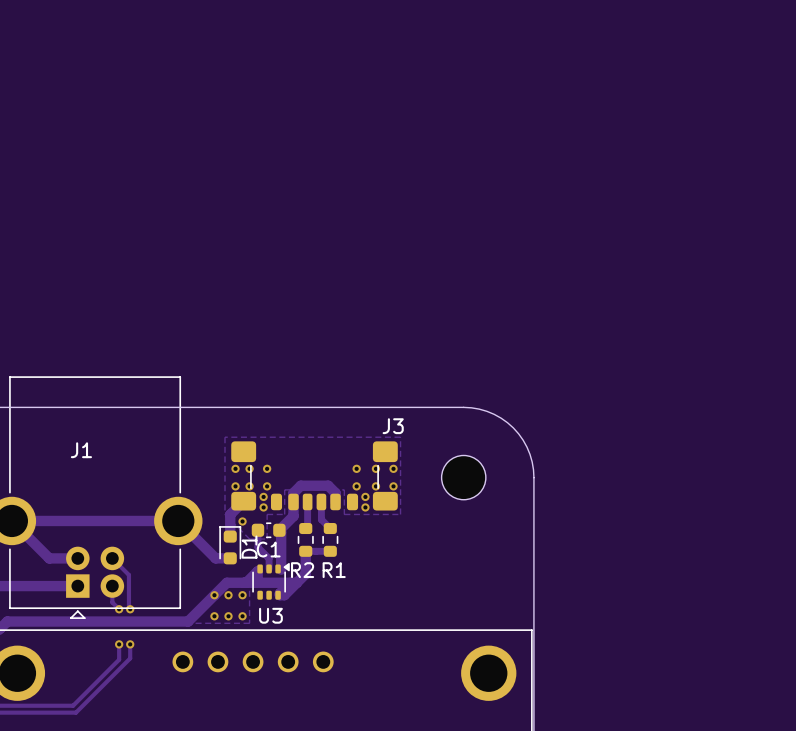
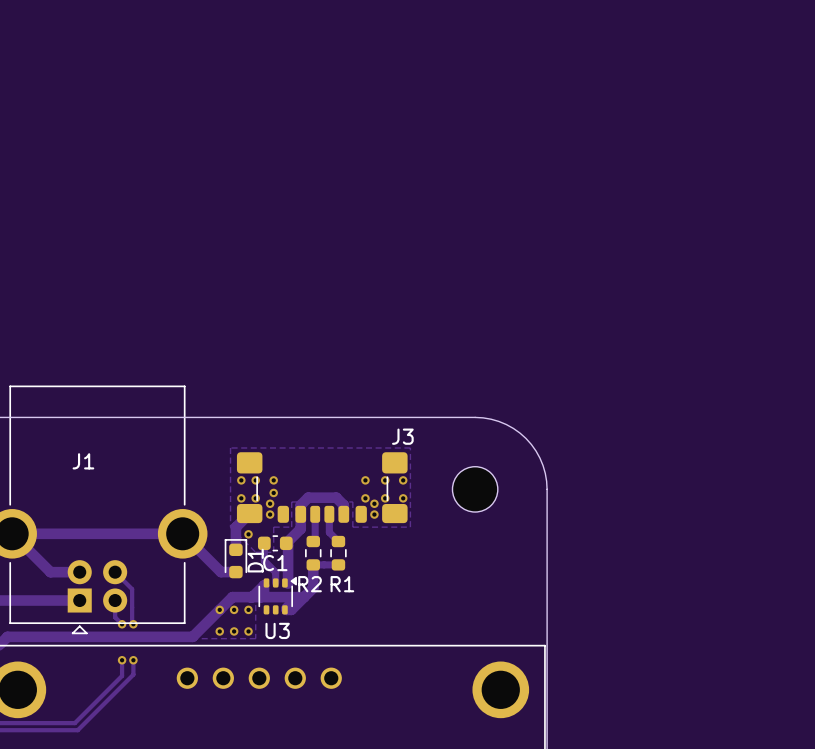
via: none -> (273, 492)
via: (267, 486) -> none
via: none -> (270, 503)
via: none -> (374, 503)
via: (263, 496) -> none
via: (365, 496) -> none
via: none -> (270, 514)
via: none -> (374, 514)
via: (263, 507) -> none
via: (365, 507) -> none

